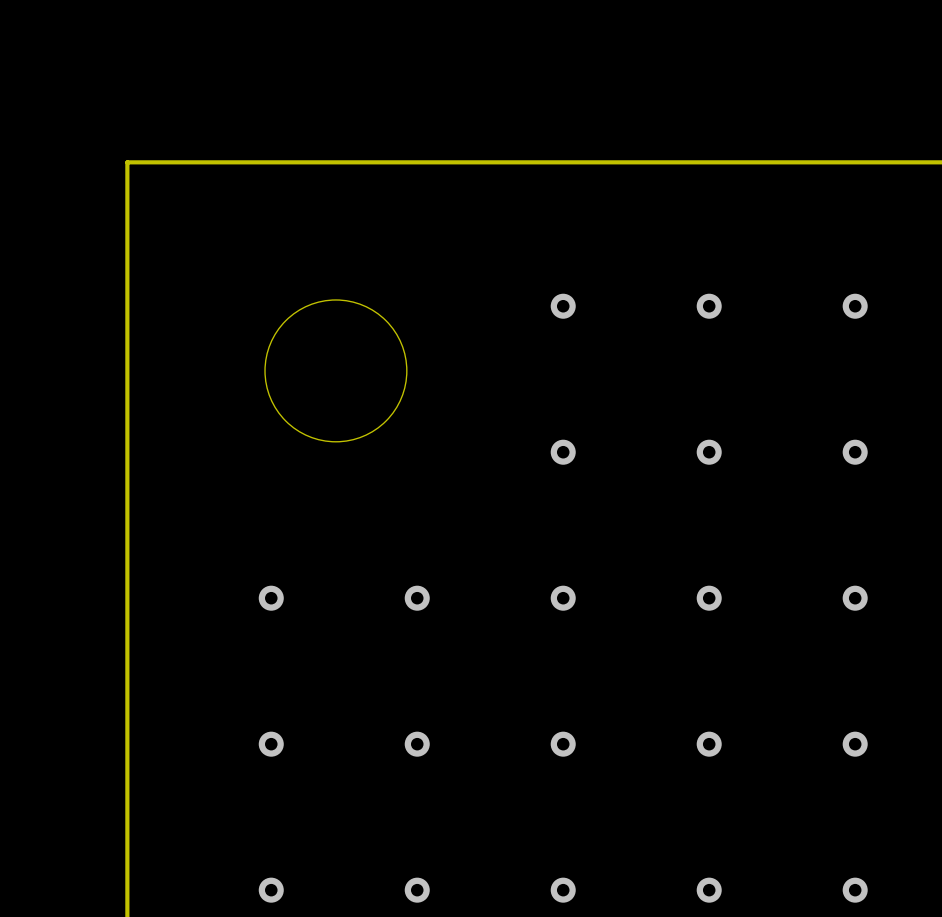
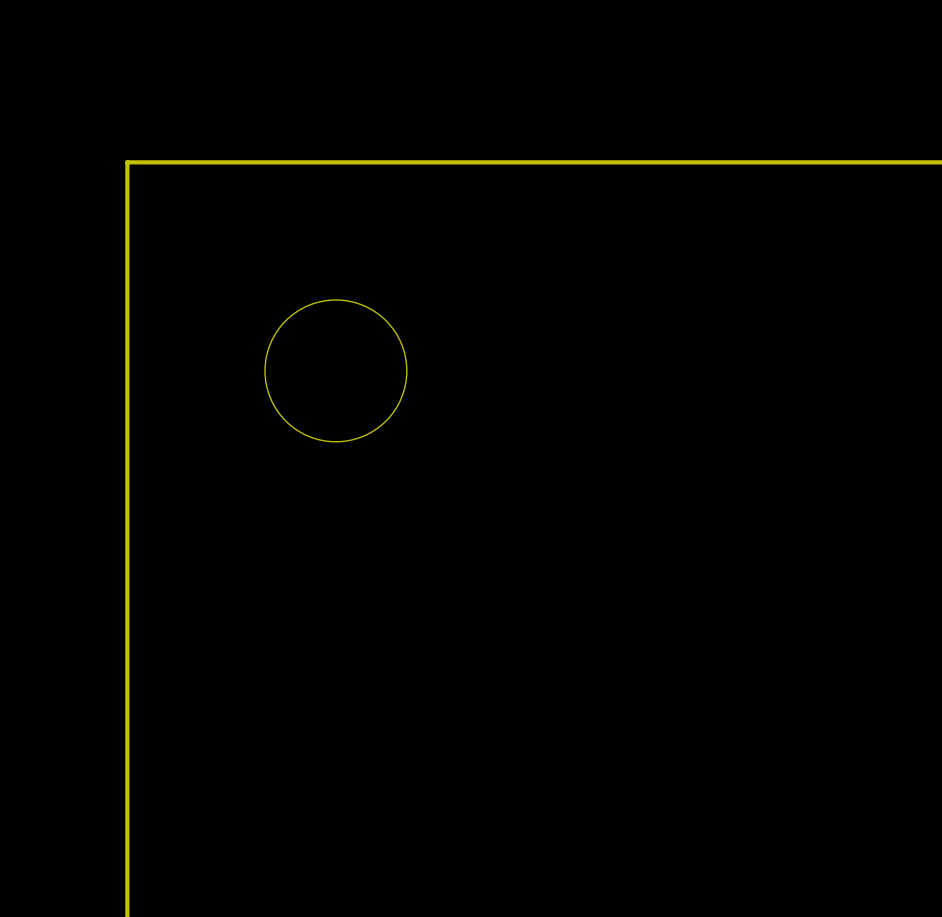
via: (563, 306) -> none
via: (709, 306) -> none
via: (855, 306) -> none
via: (563, 452) -> none
via: (709, 452) -> none
via: (855, 452) -> none
via: (271, 598) -> none
via: (417, 598) -> none
via: (563, 598) -> none
via: (709, 598) -> none
via: (855, 598) -> none
via: (271, 744) -> none
via: (417, 744) -> none
via: (563, 744) -> none
via: (709, 744) -> none
via: (855, 744) -> none
via: (271, 890) -> none
via: (417, 890) -> none
via: (563, 890) -> none
via: (709, 890) -> none
via: (855, 890) -> none

